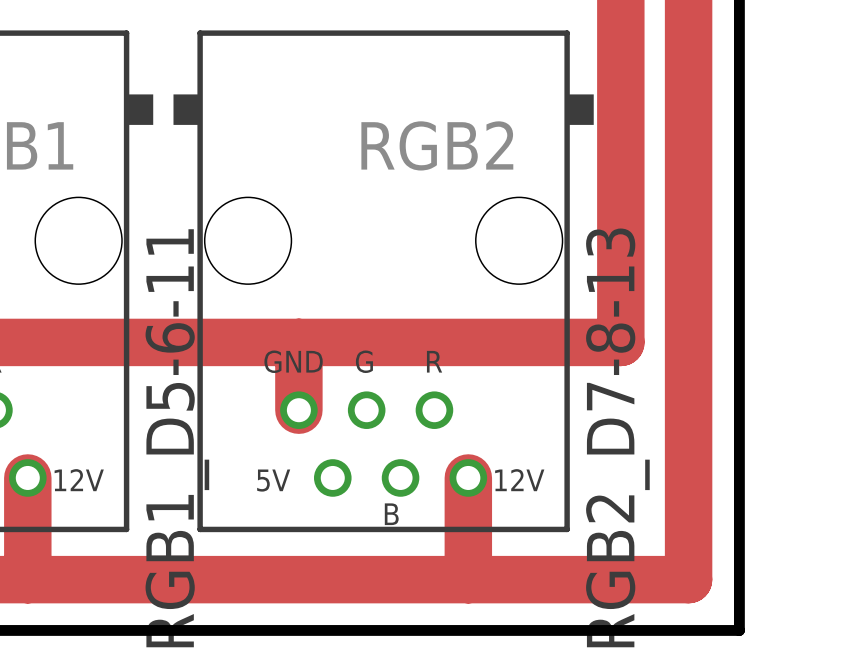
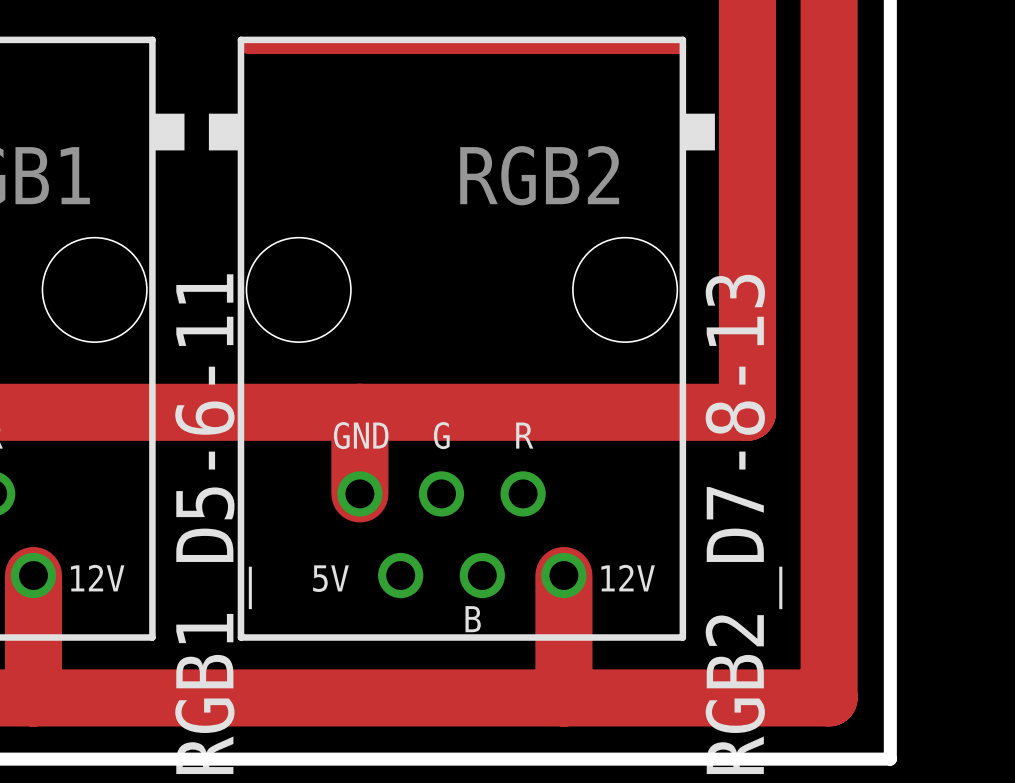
track: none -> (248, 46) (678, 46)

